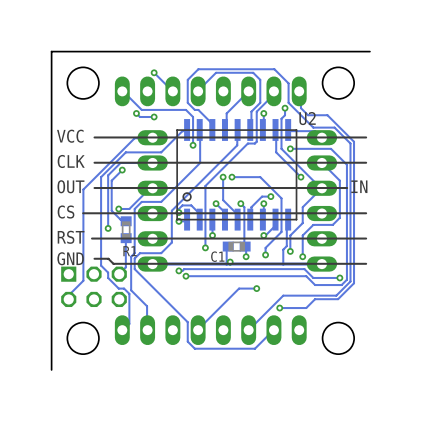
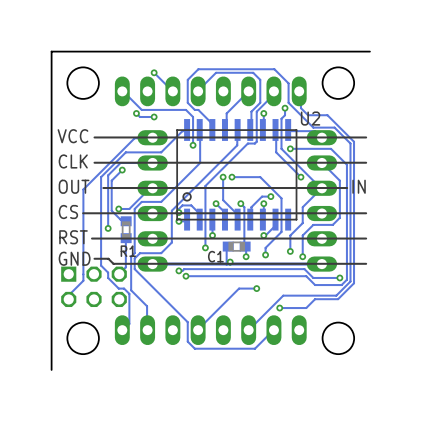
line: (103, 188) (94, 188) -> none
track: (288, 219) (286, 246) (283, 249) (283, 264) -> none

